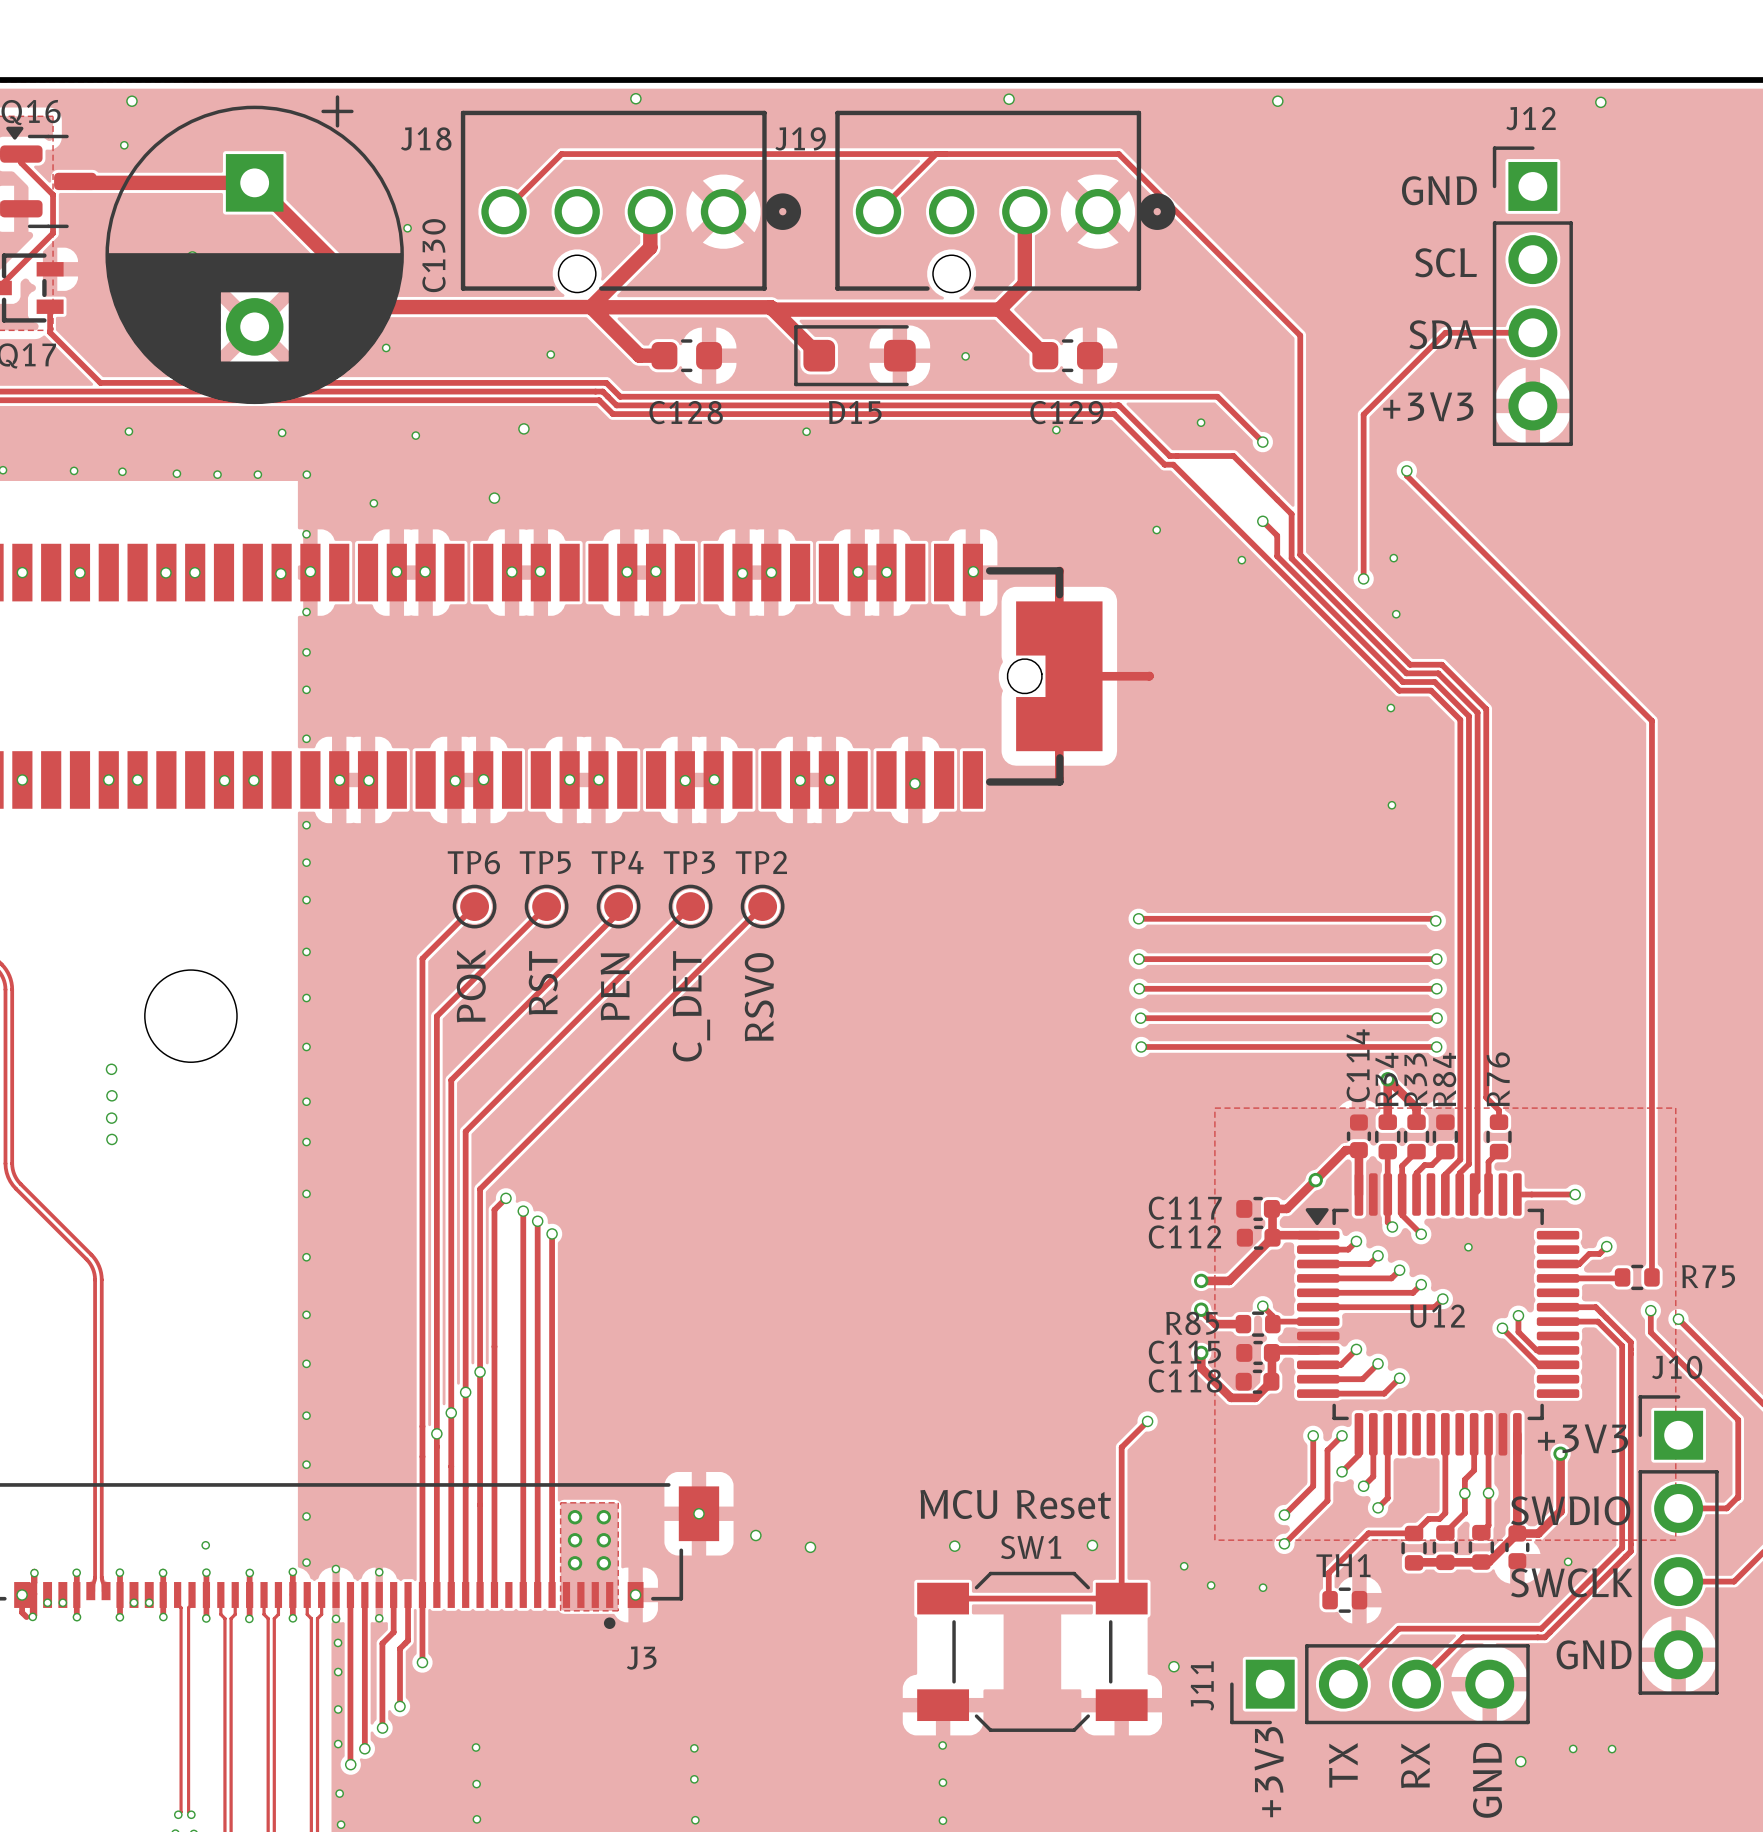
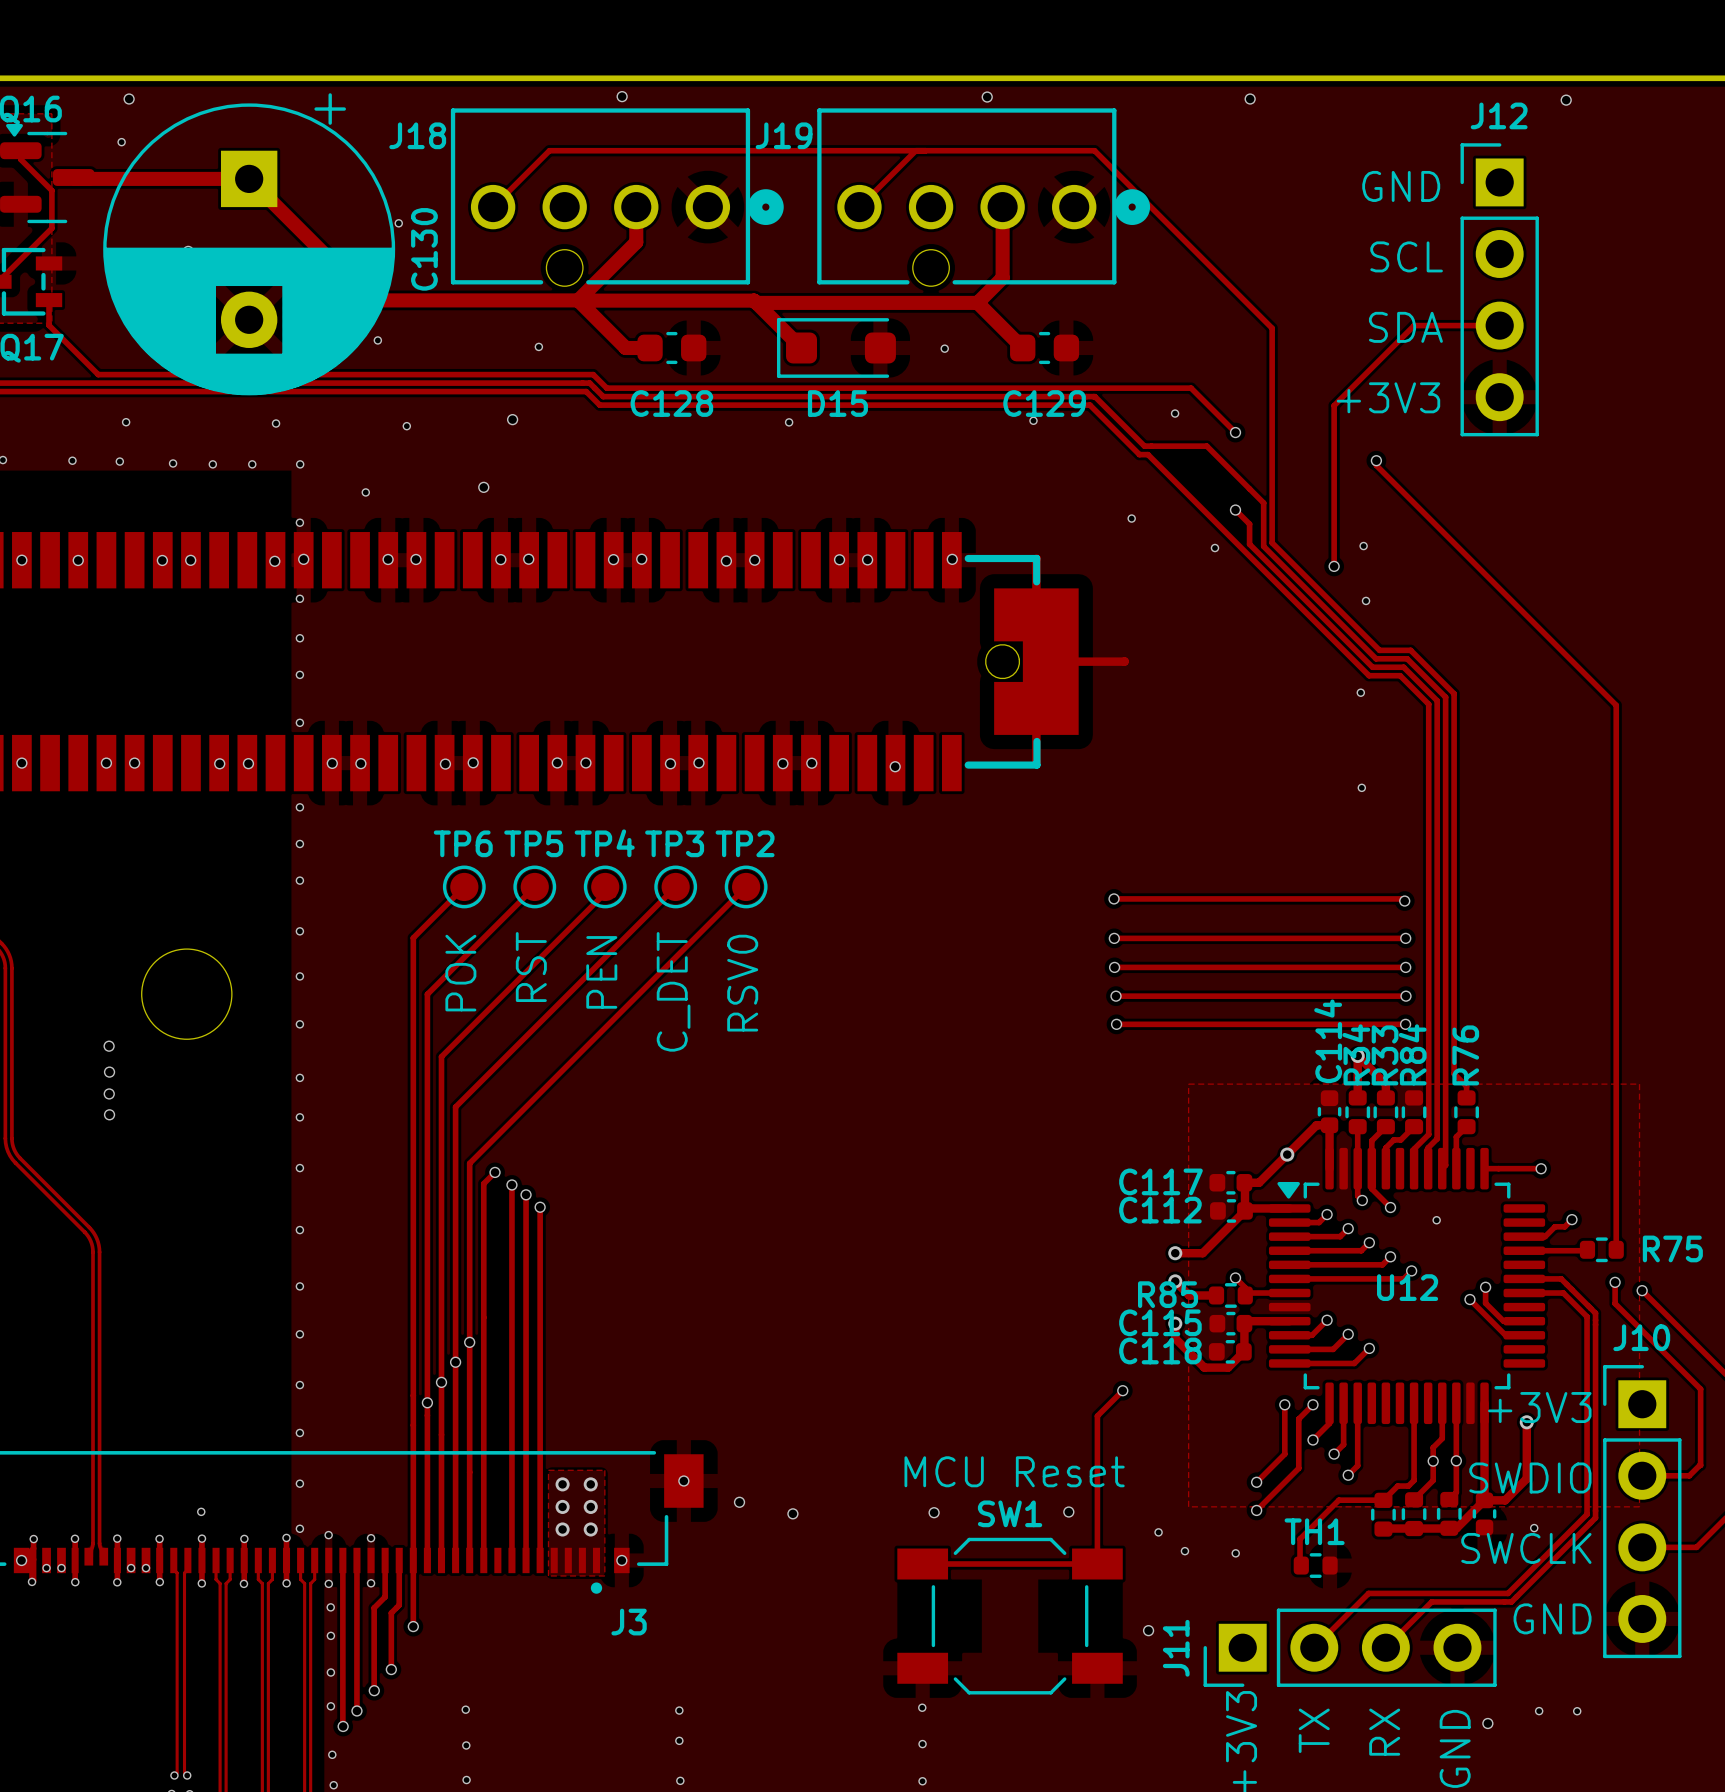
track: (22, 1594) (22, 1612) (26, 1617) -> none

